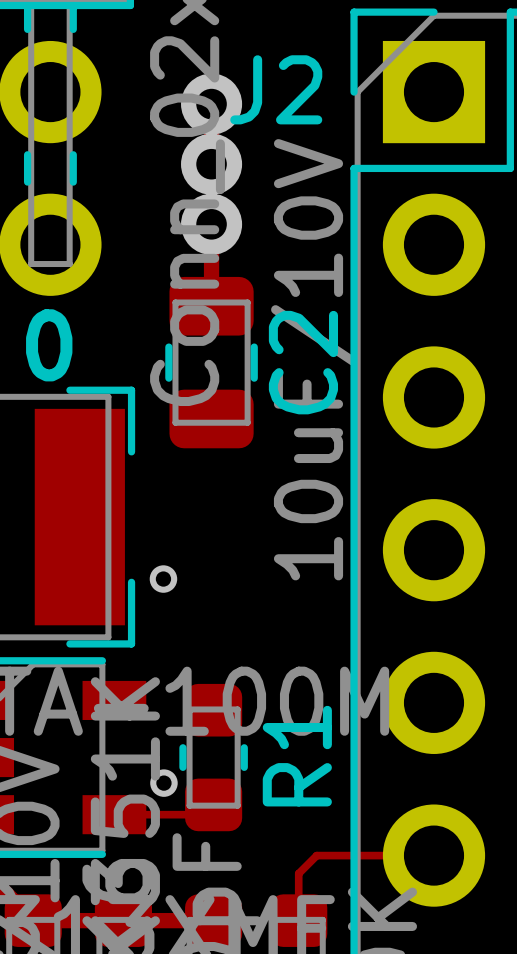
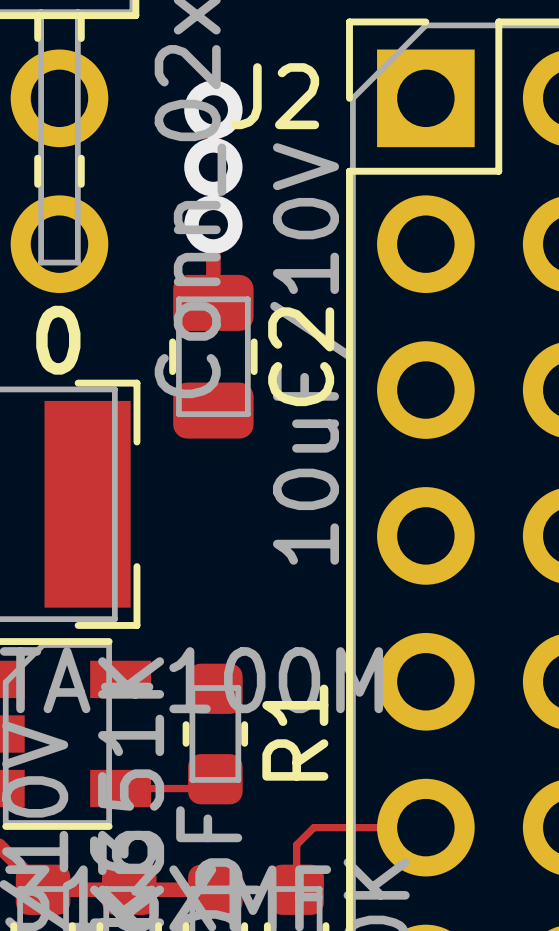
via: (163, 579) -> none
via: (163, 783) -> none

